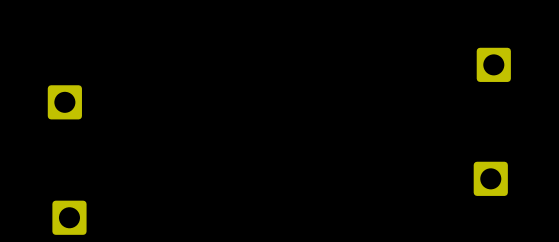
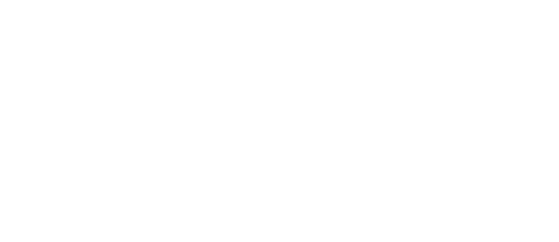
part: (493, 64) -> none
part: (64, 102) -> none
part: (490, 178) -> none
part: (69, 217) -> none

